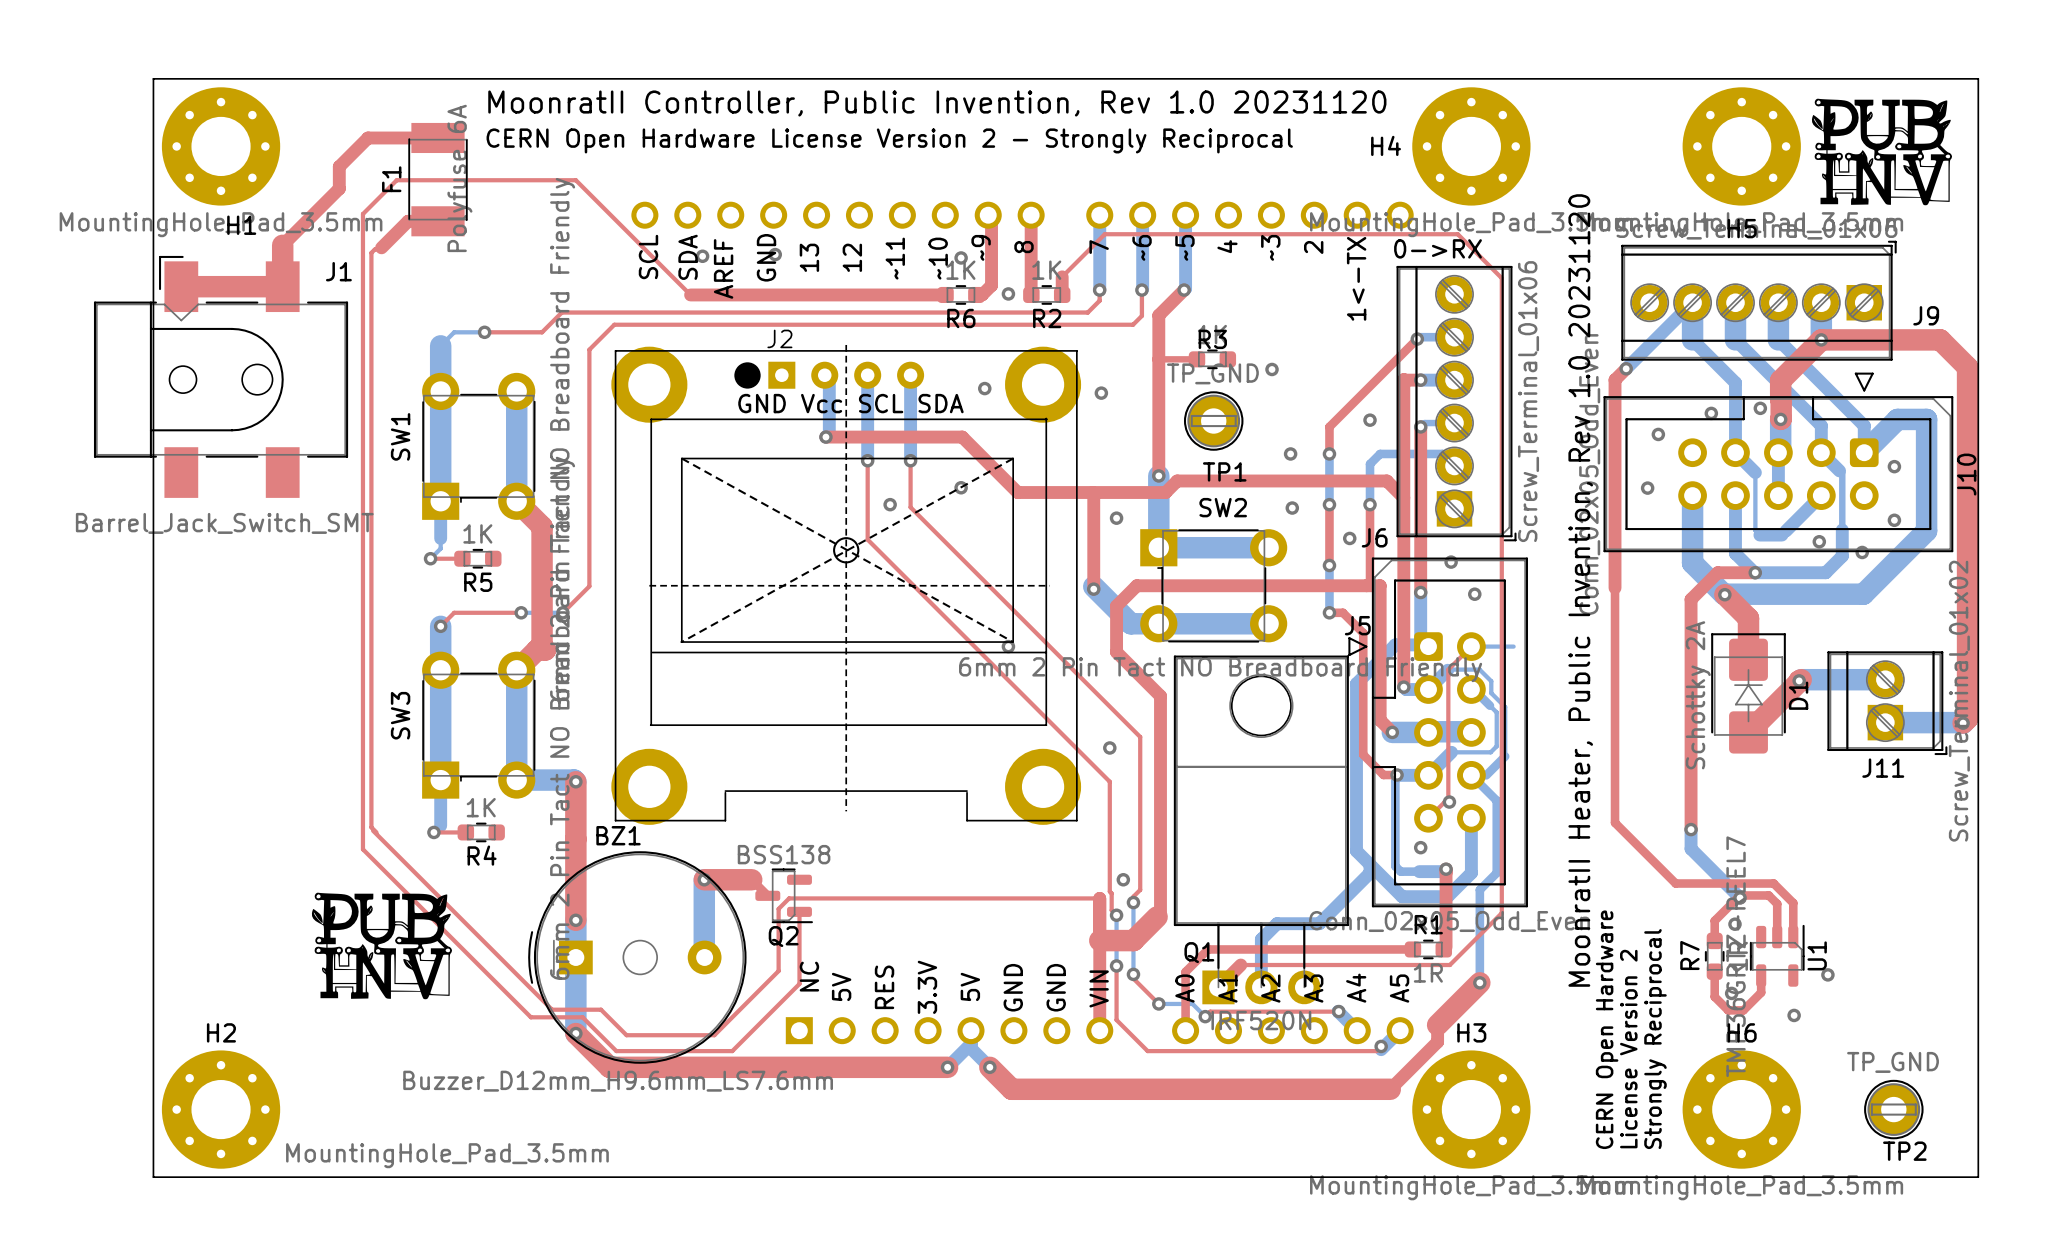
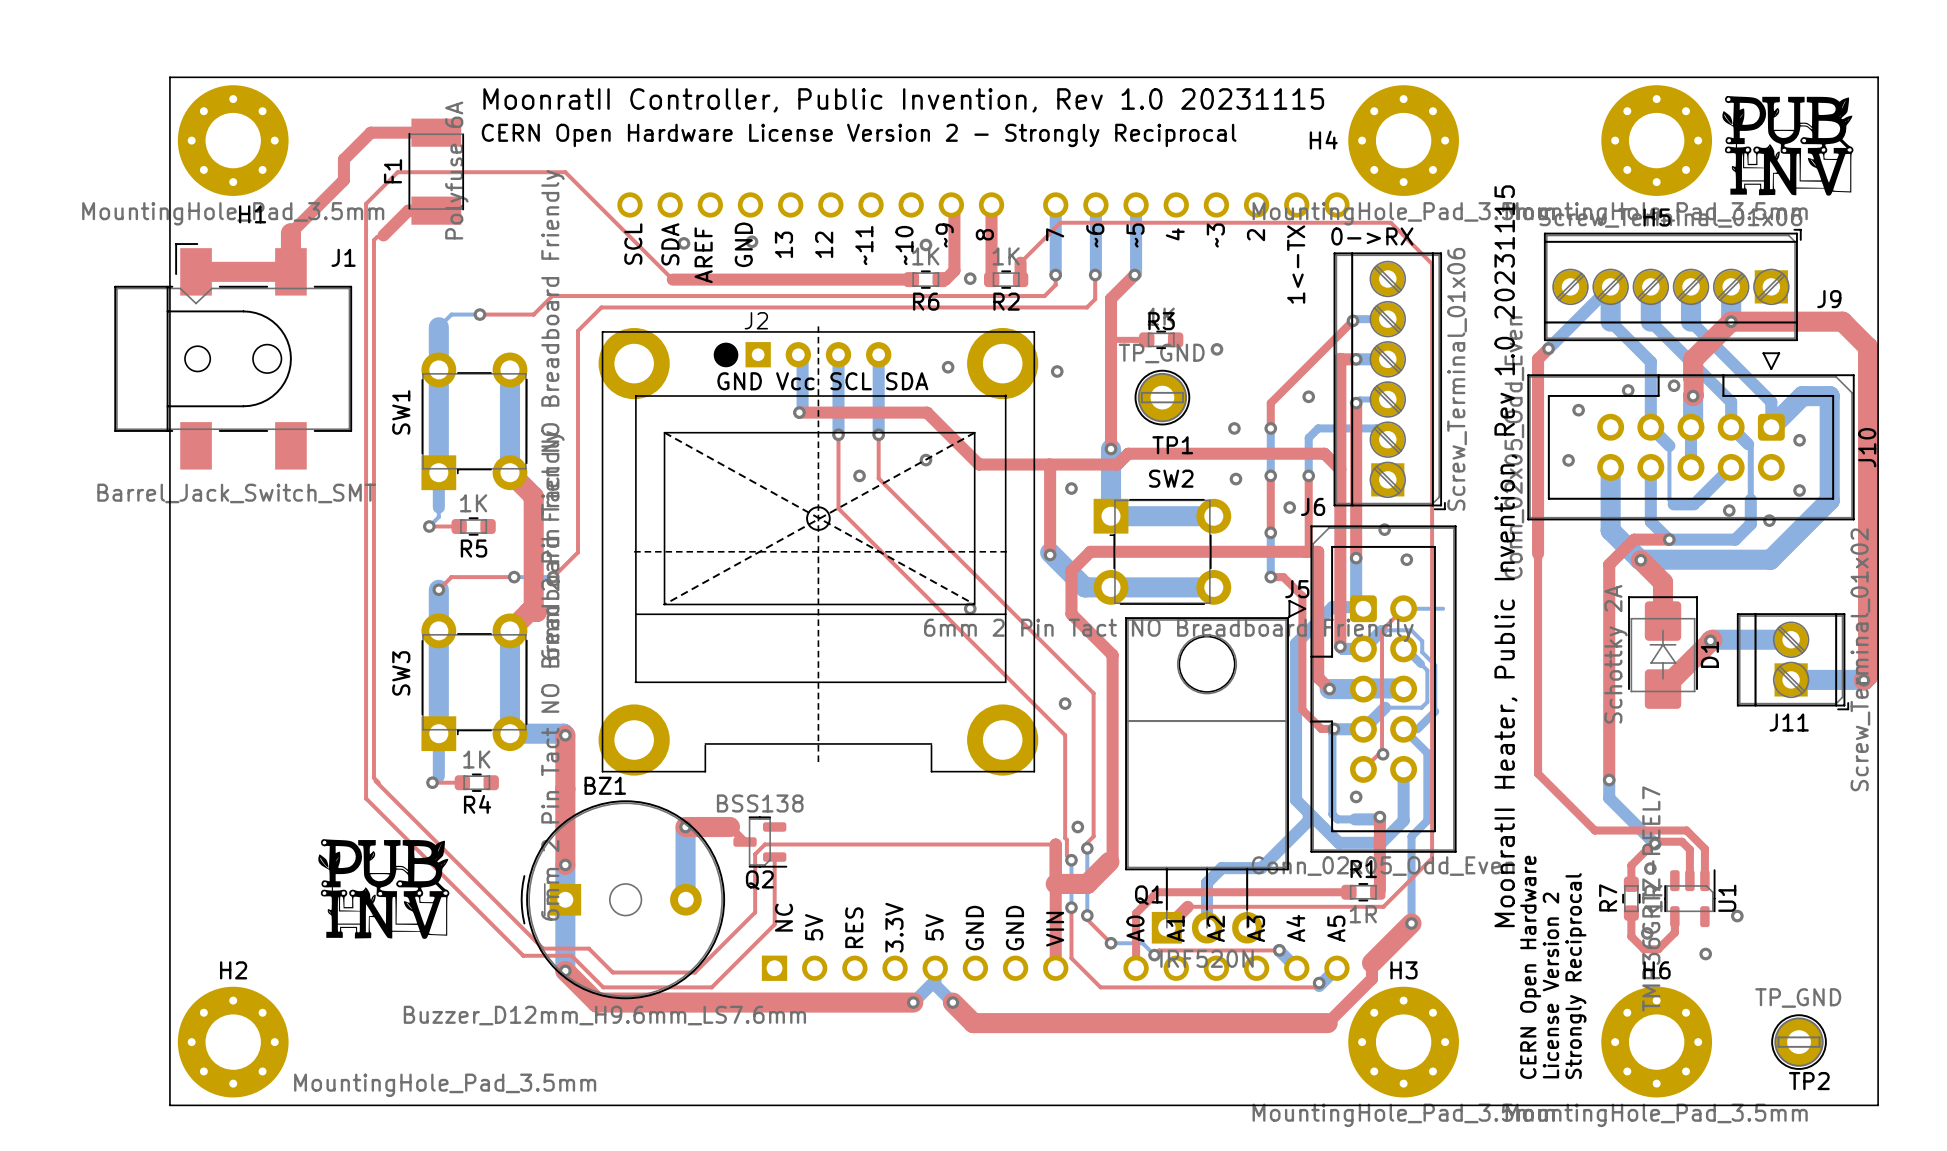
text: MoonratII Controller, Public Invention, Rev 1.0 20231120 (937, 103) -> MoonratII Controller, Public Invention, Rev 1.0 20231115 (903, 100)
text: MoonratII Heater, Public Invention, Rev 1.0 20231120 (1580, 590) -> MoonratII Heater, Public Invention, Rev 1.0 20231115 (1505, 556)

